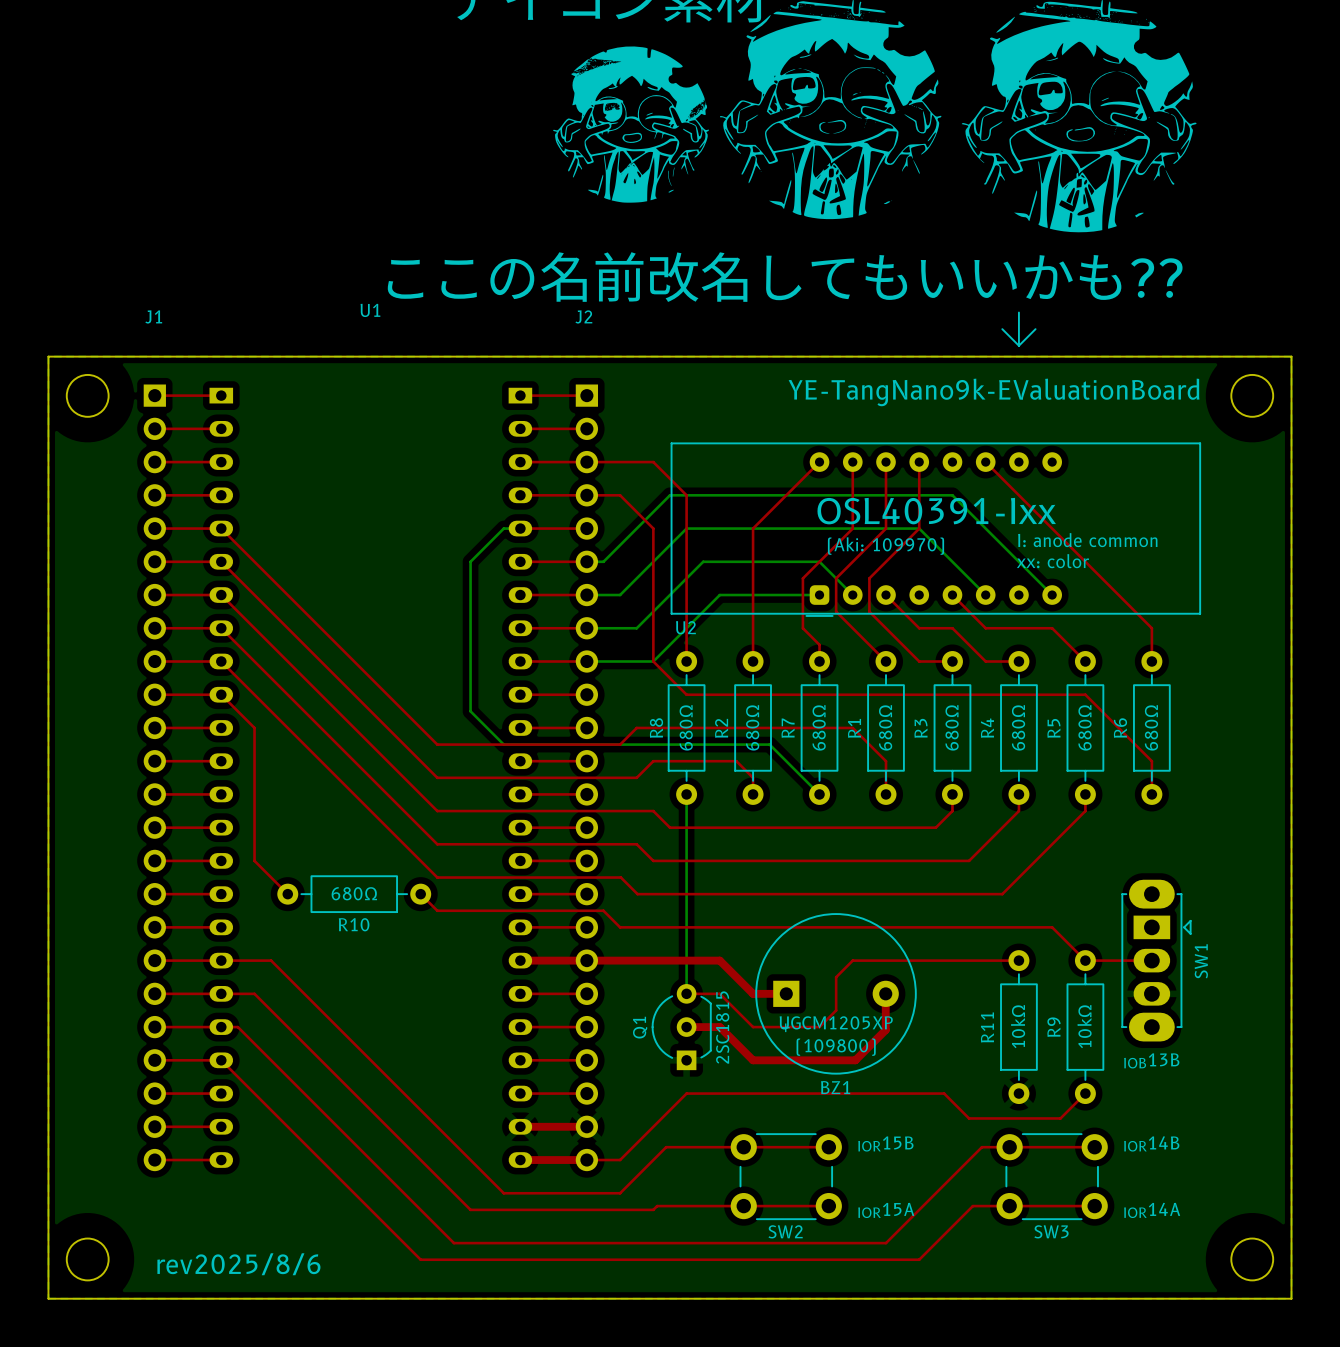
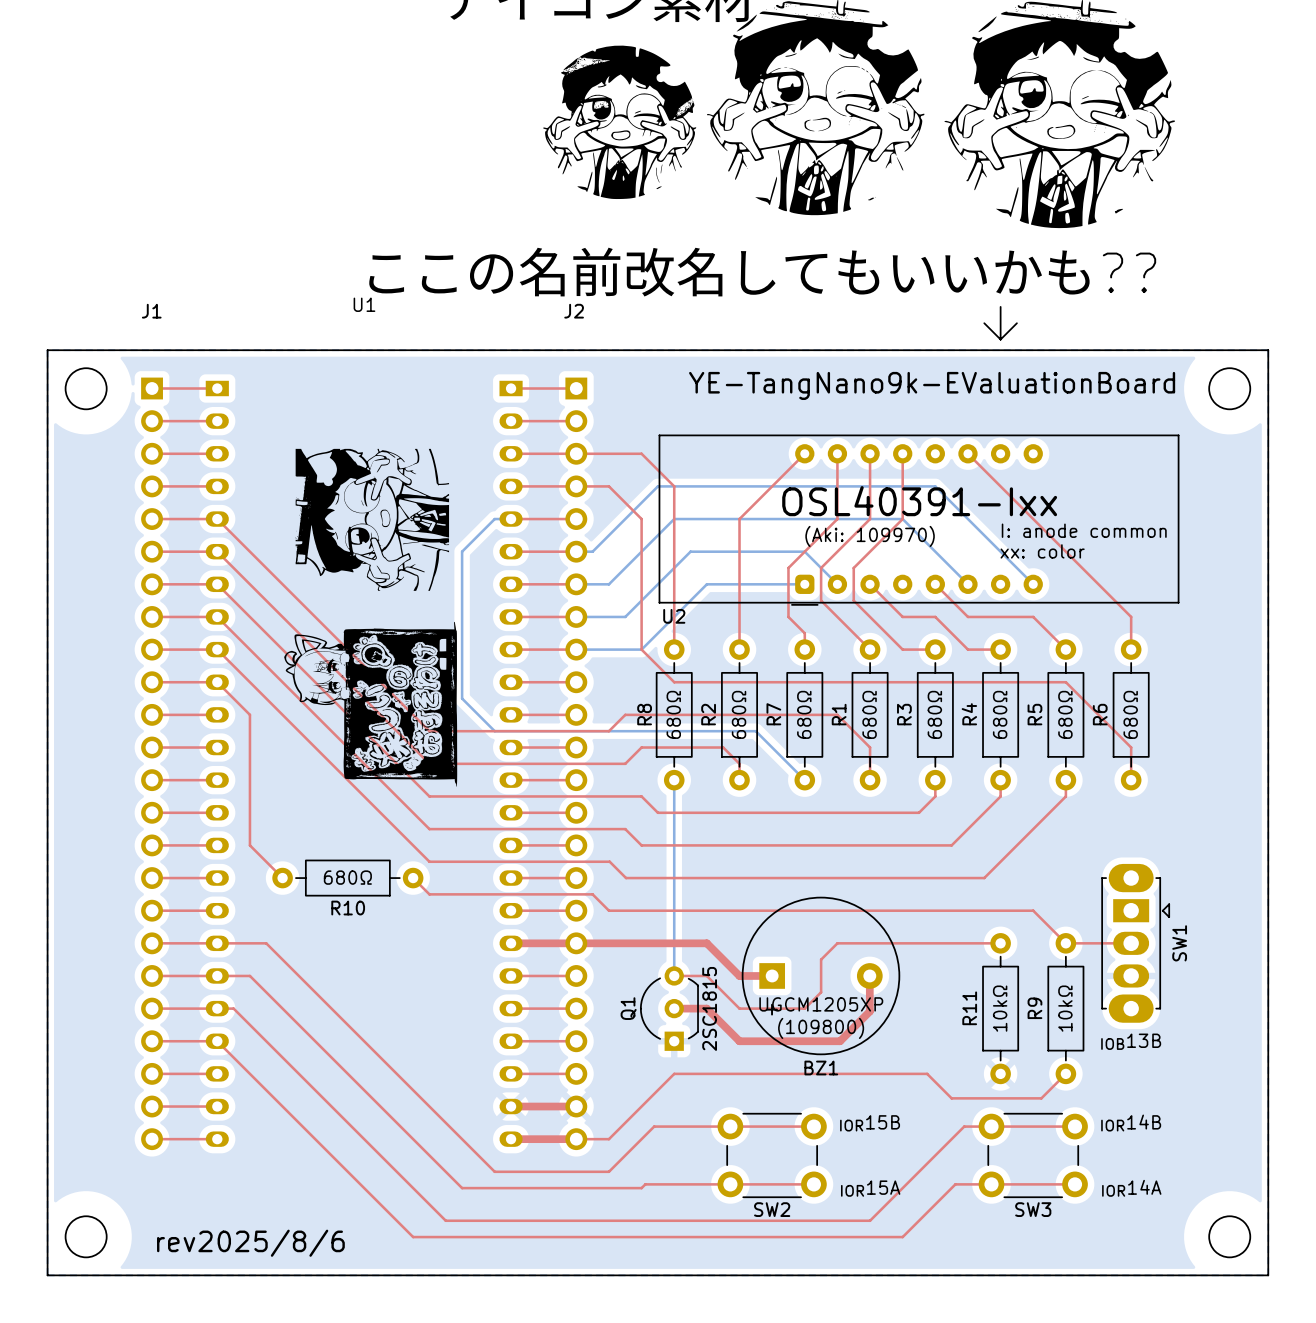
drawing: none -> [295, 448, 450, 591]
drawing: none -> [284, 621, 458, 787]

